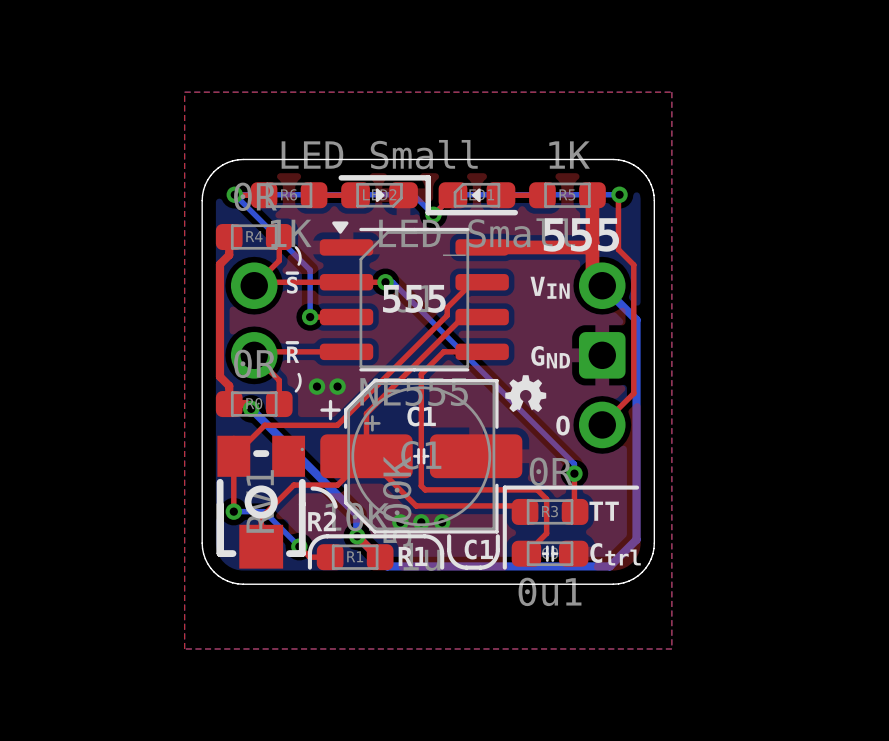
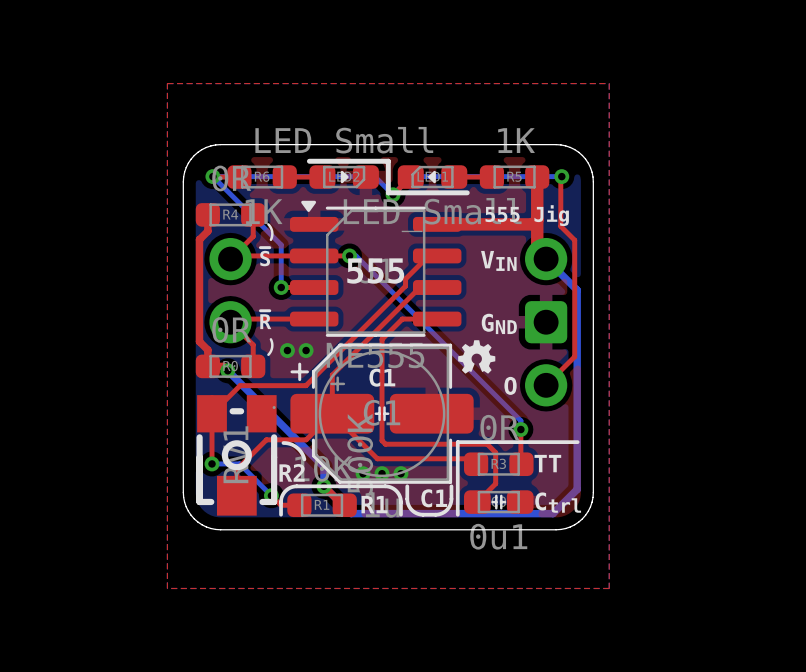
text: 555 (581, 234) -> 555 Jig (527, 215)

